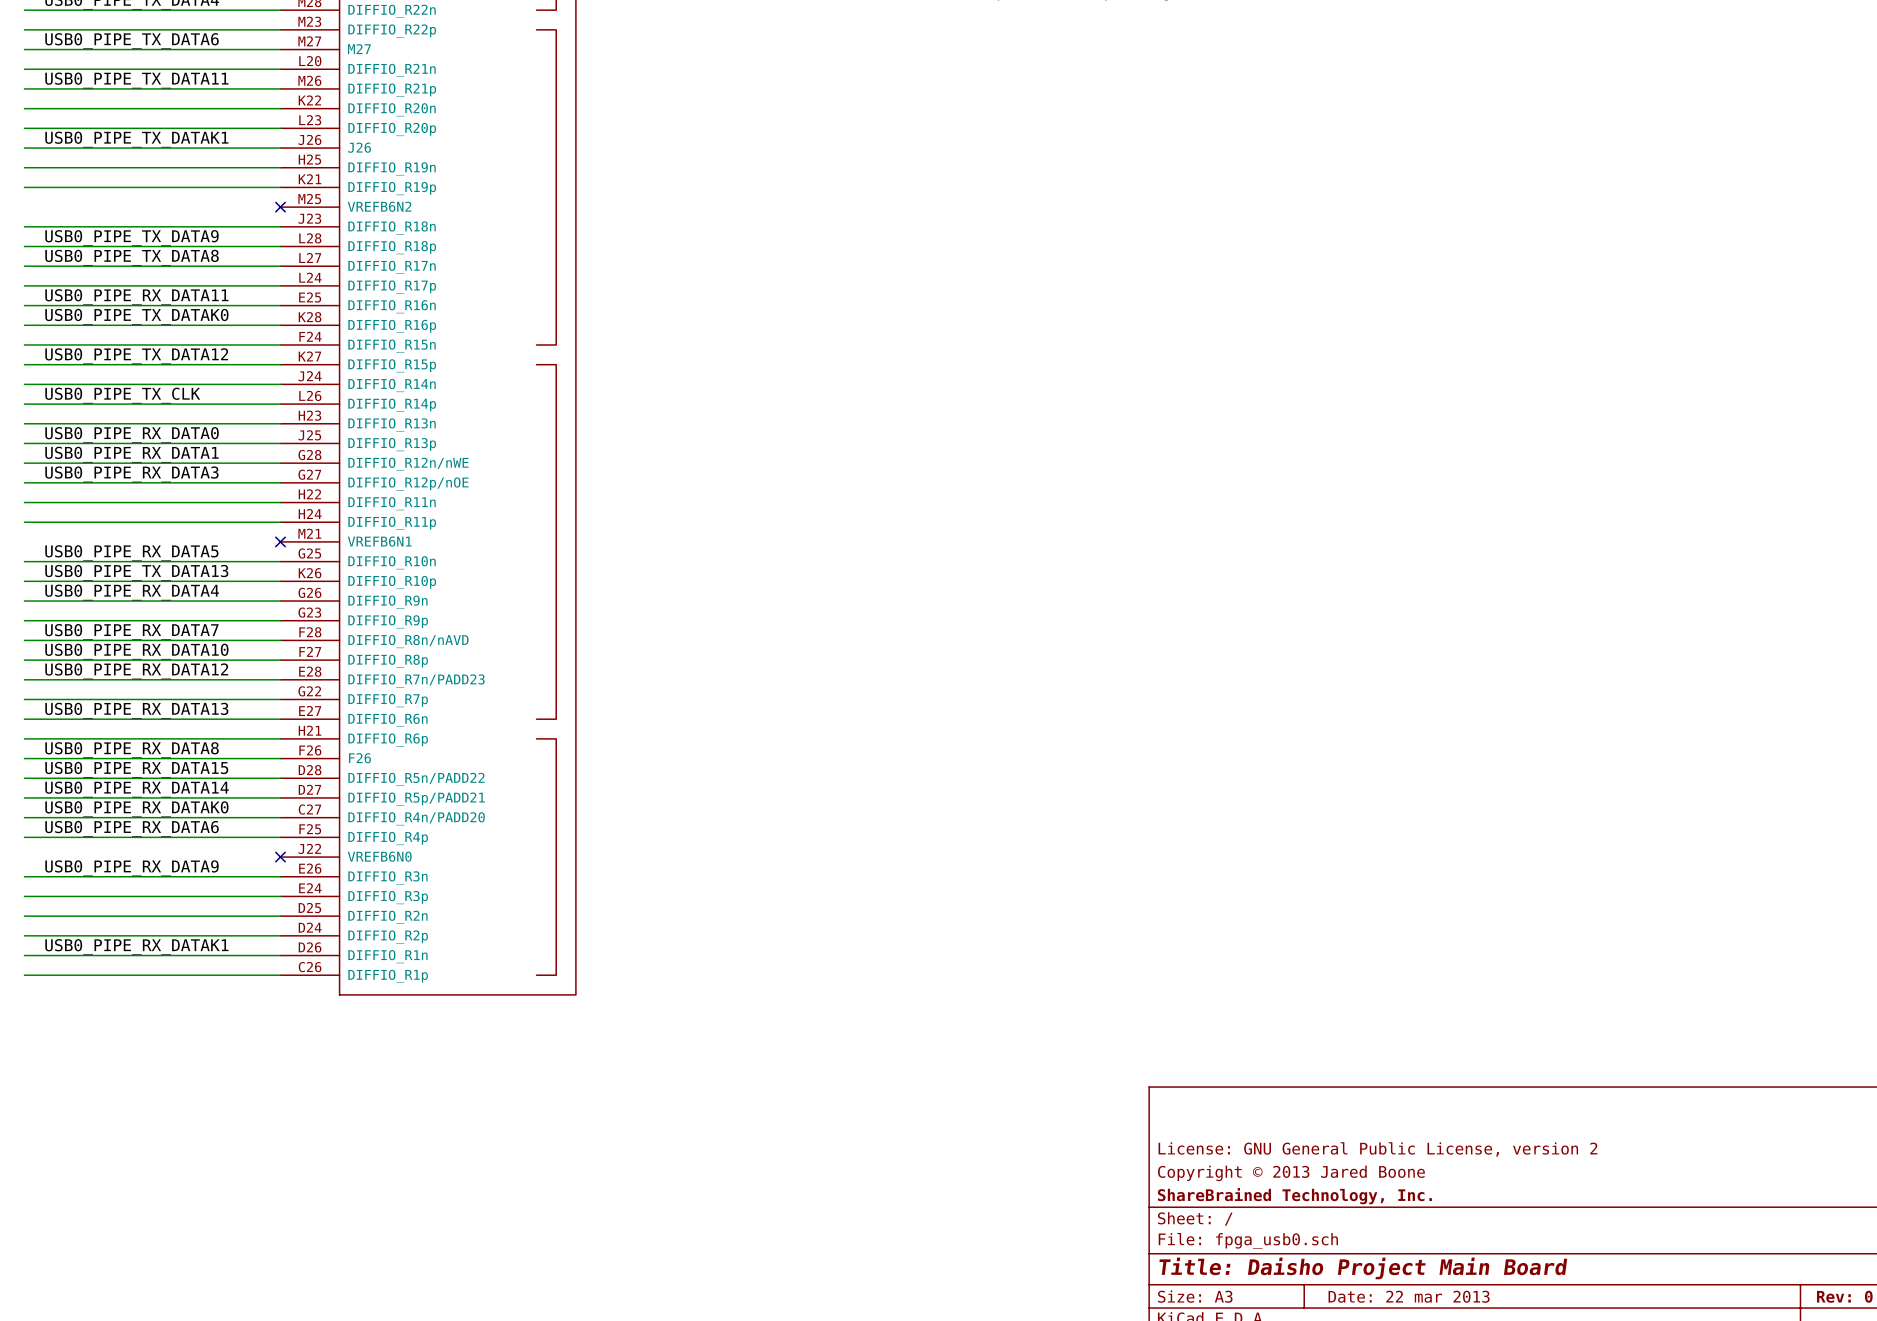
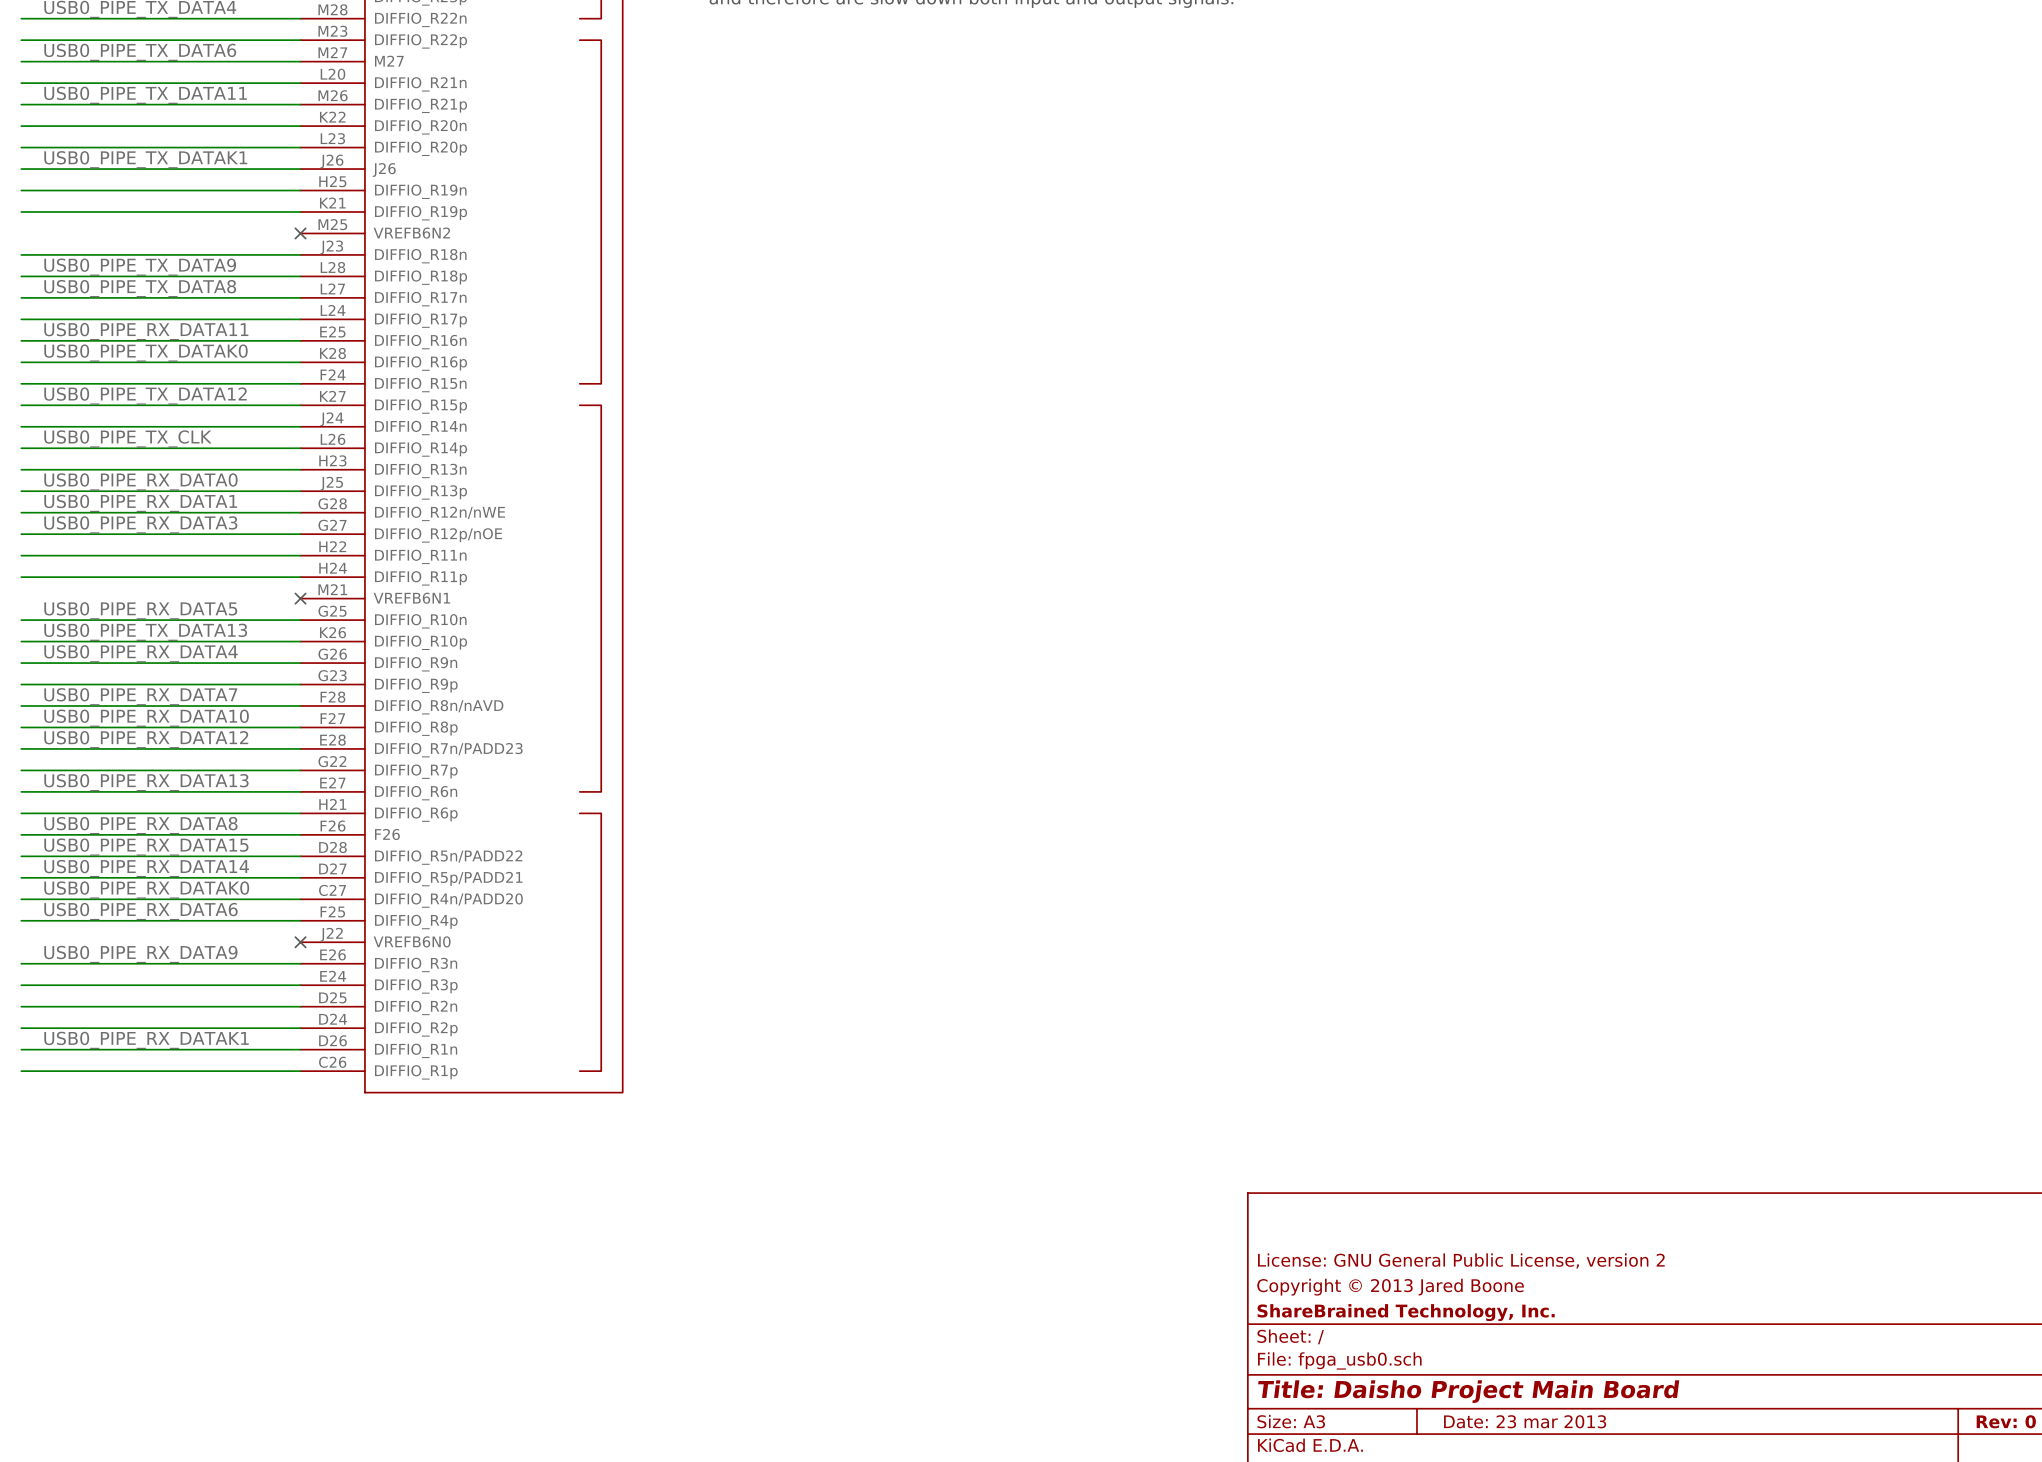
title block: Date: 22 mar 2013 (1409, 1296) -> Date: 23 mar 2013 (1525, 1421)

